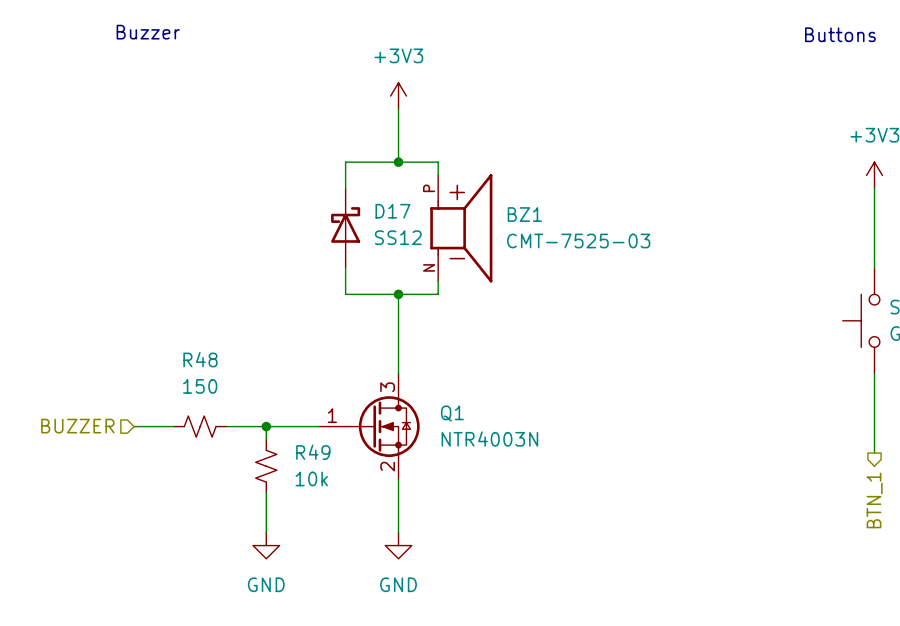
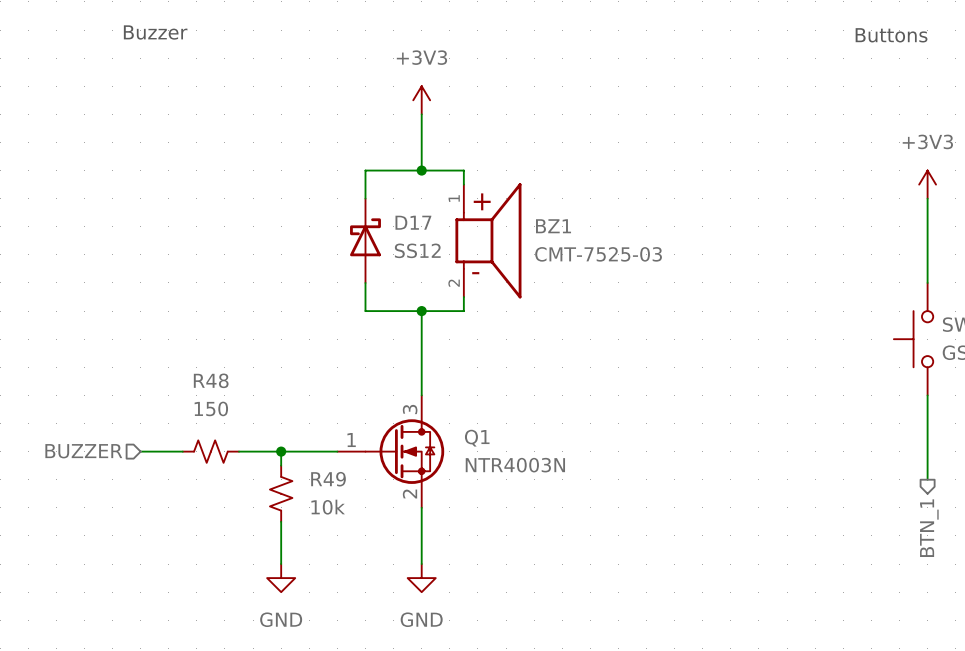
BZ1 pin number: P (429, 188) -> 1 (454, 198)
BZ1 pin number: N (429, 267) -> 2 (454, 283)

